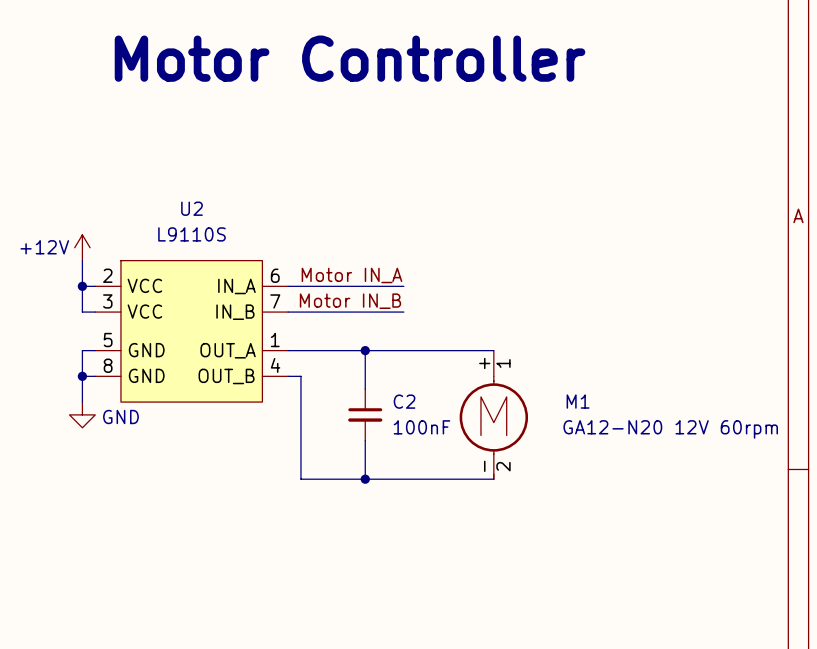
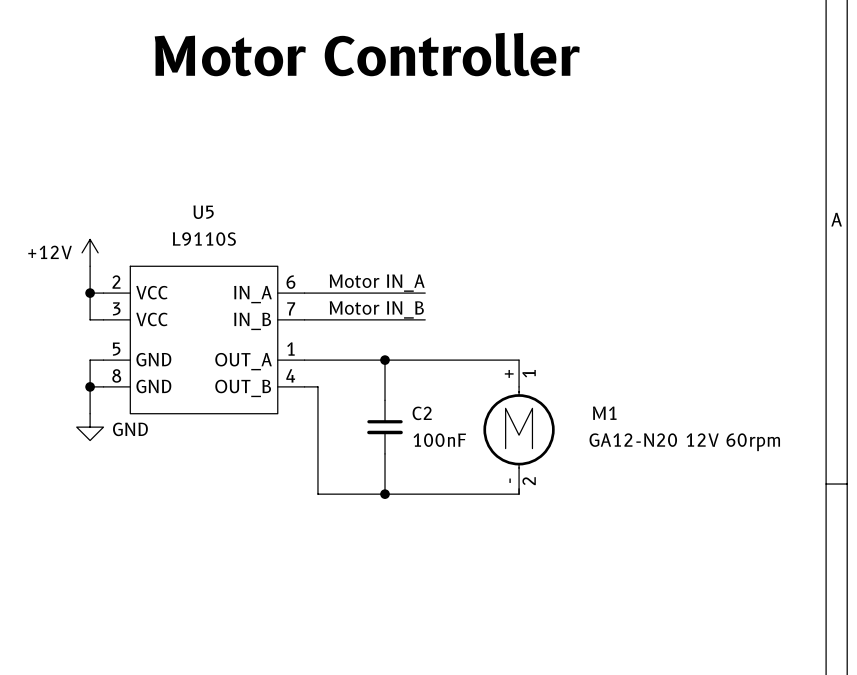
U2 name: U2 (191, 208) -> U5 (203, 212)

